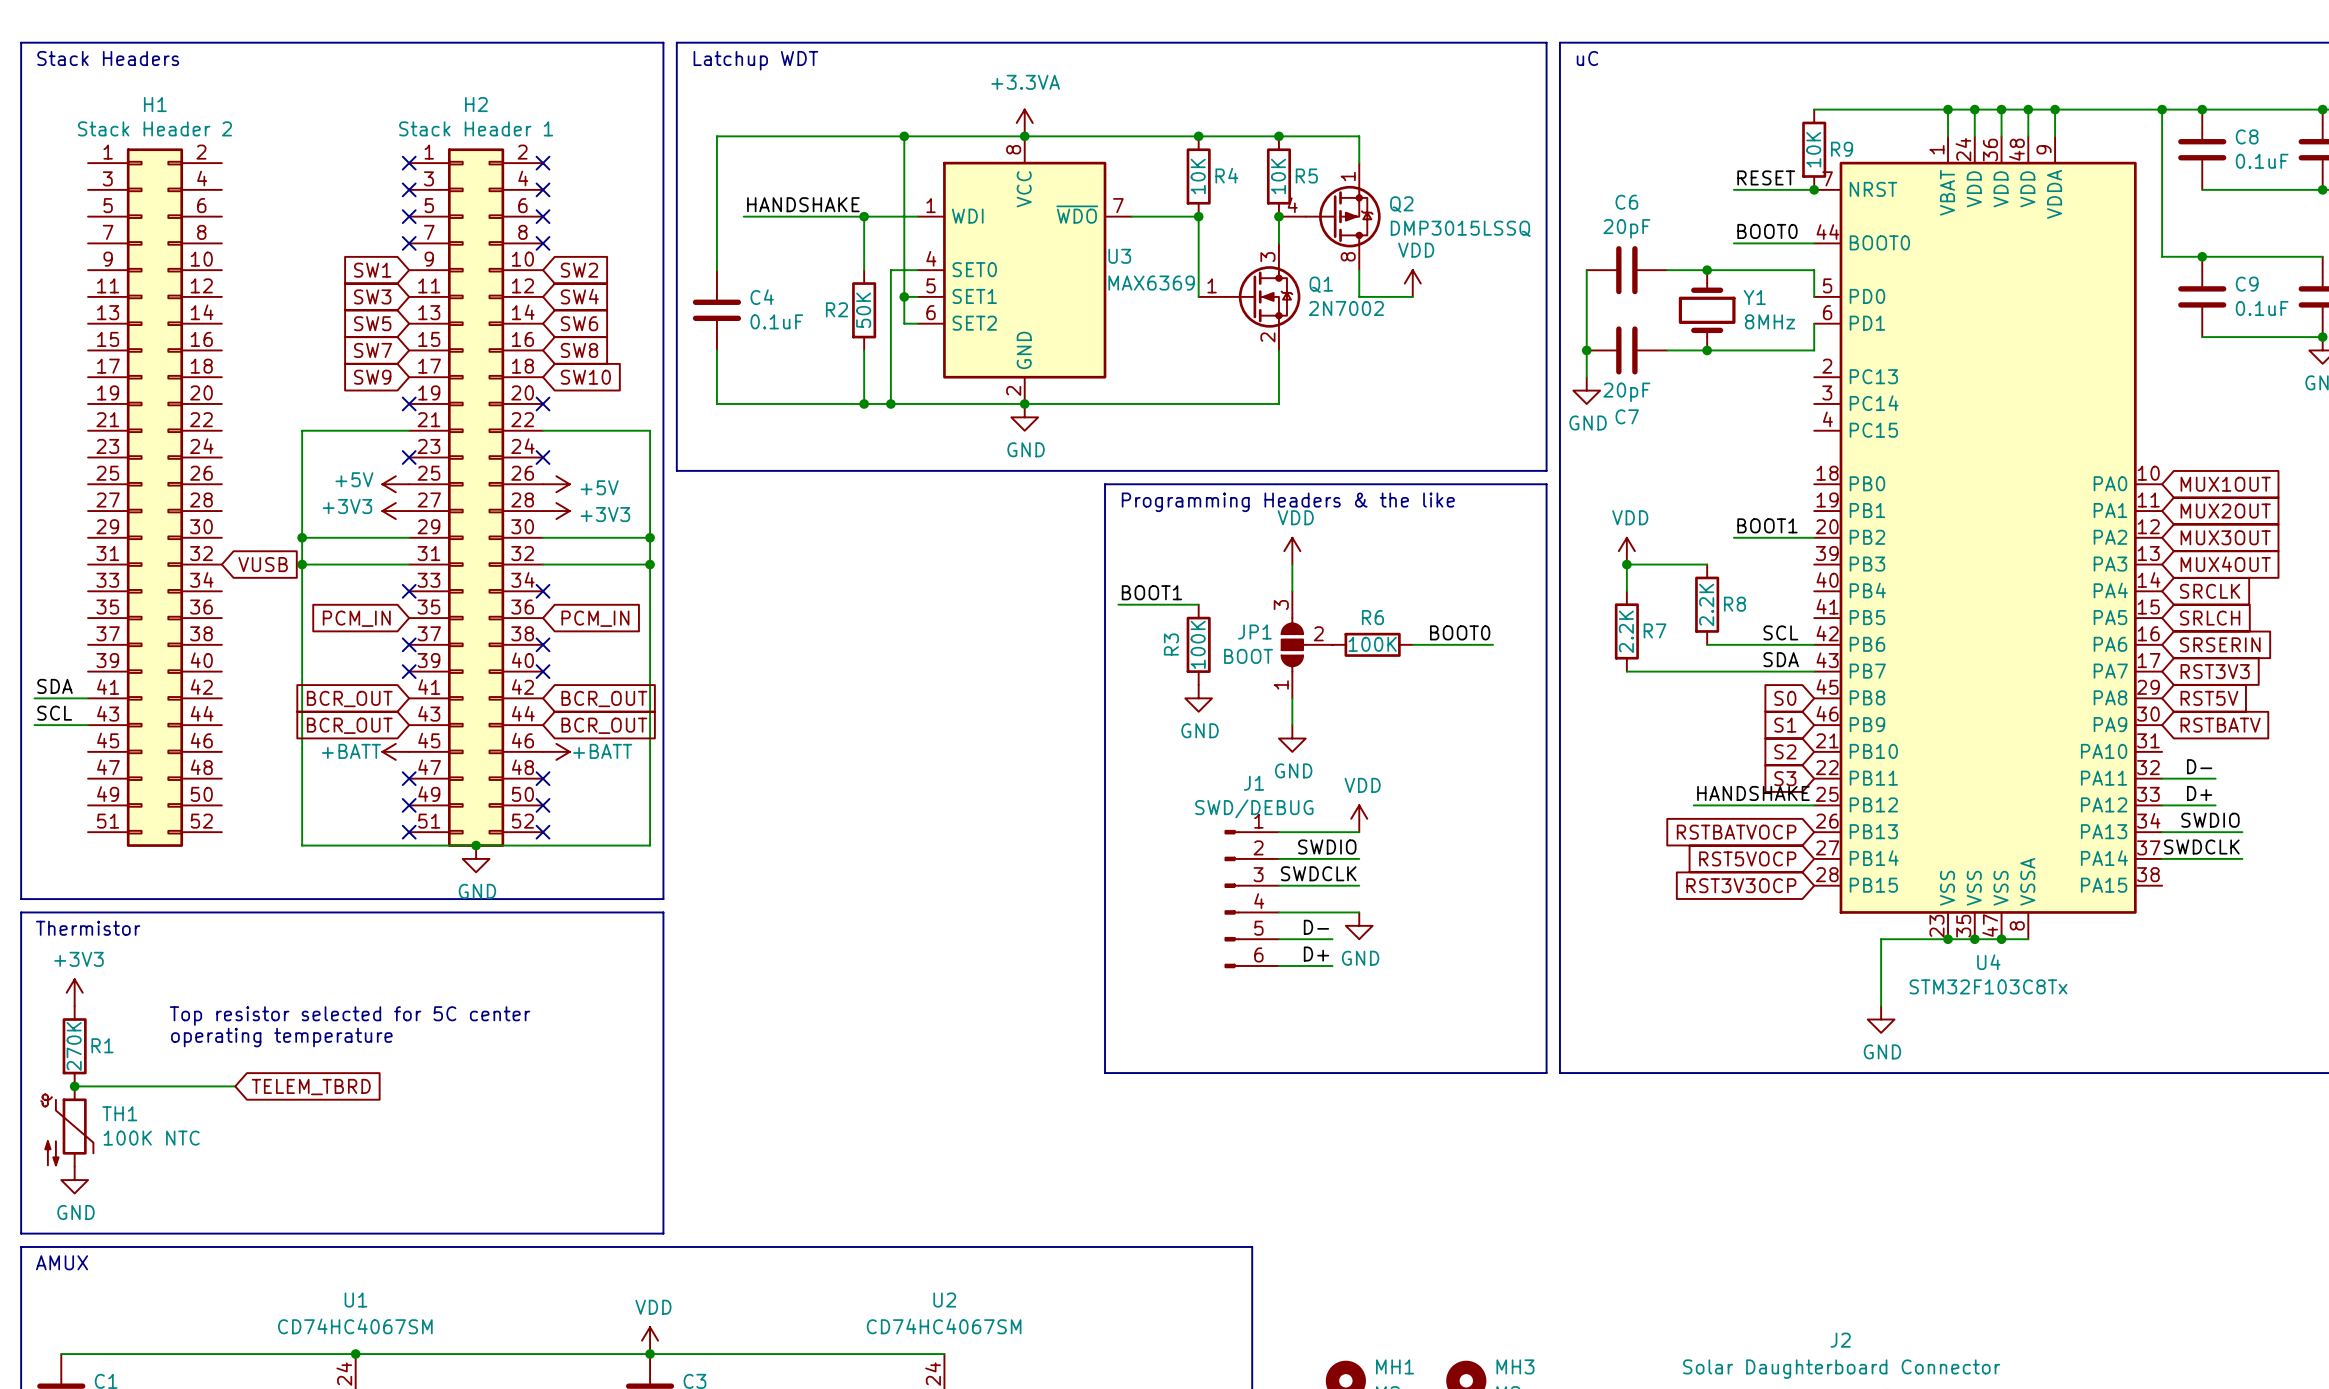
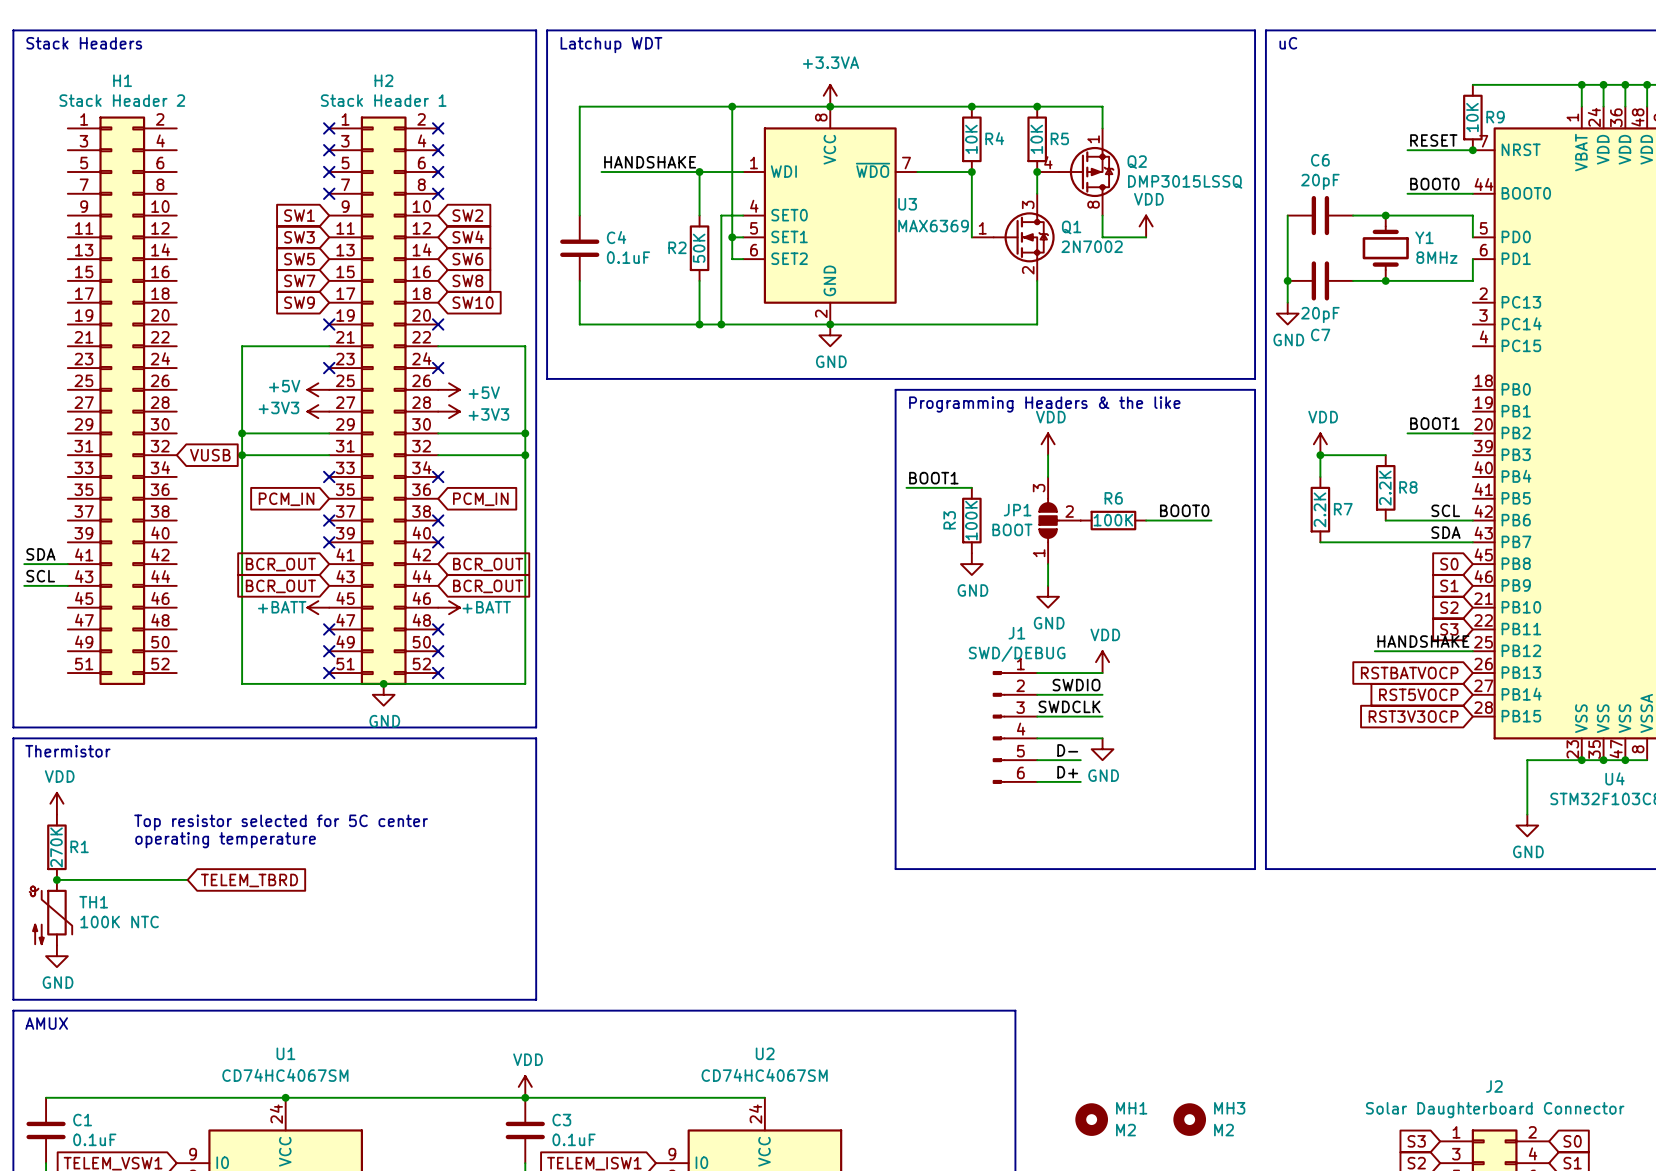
power symbol: +3V3 (74, 992) -> VDD (56, 803)

